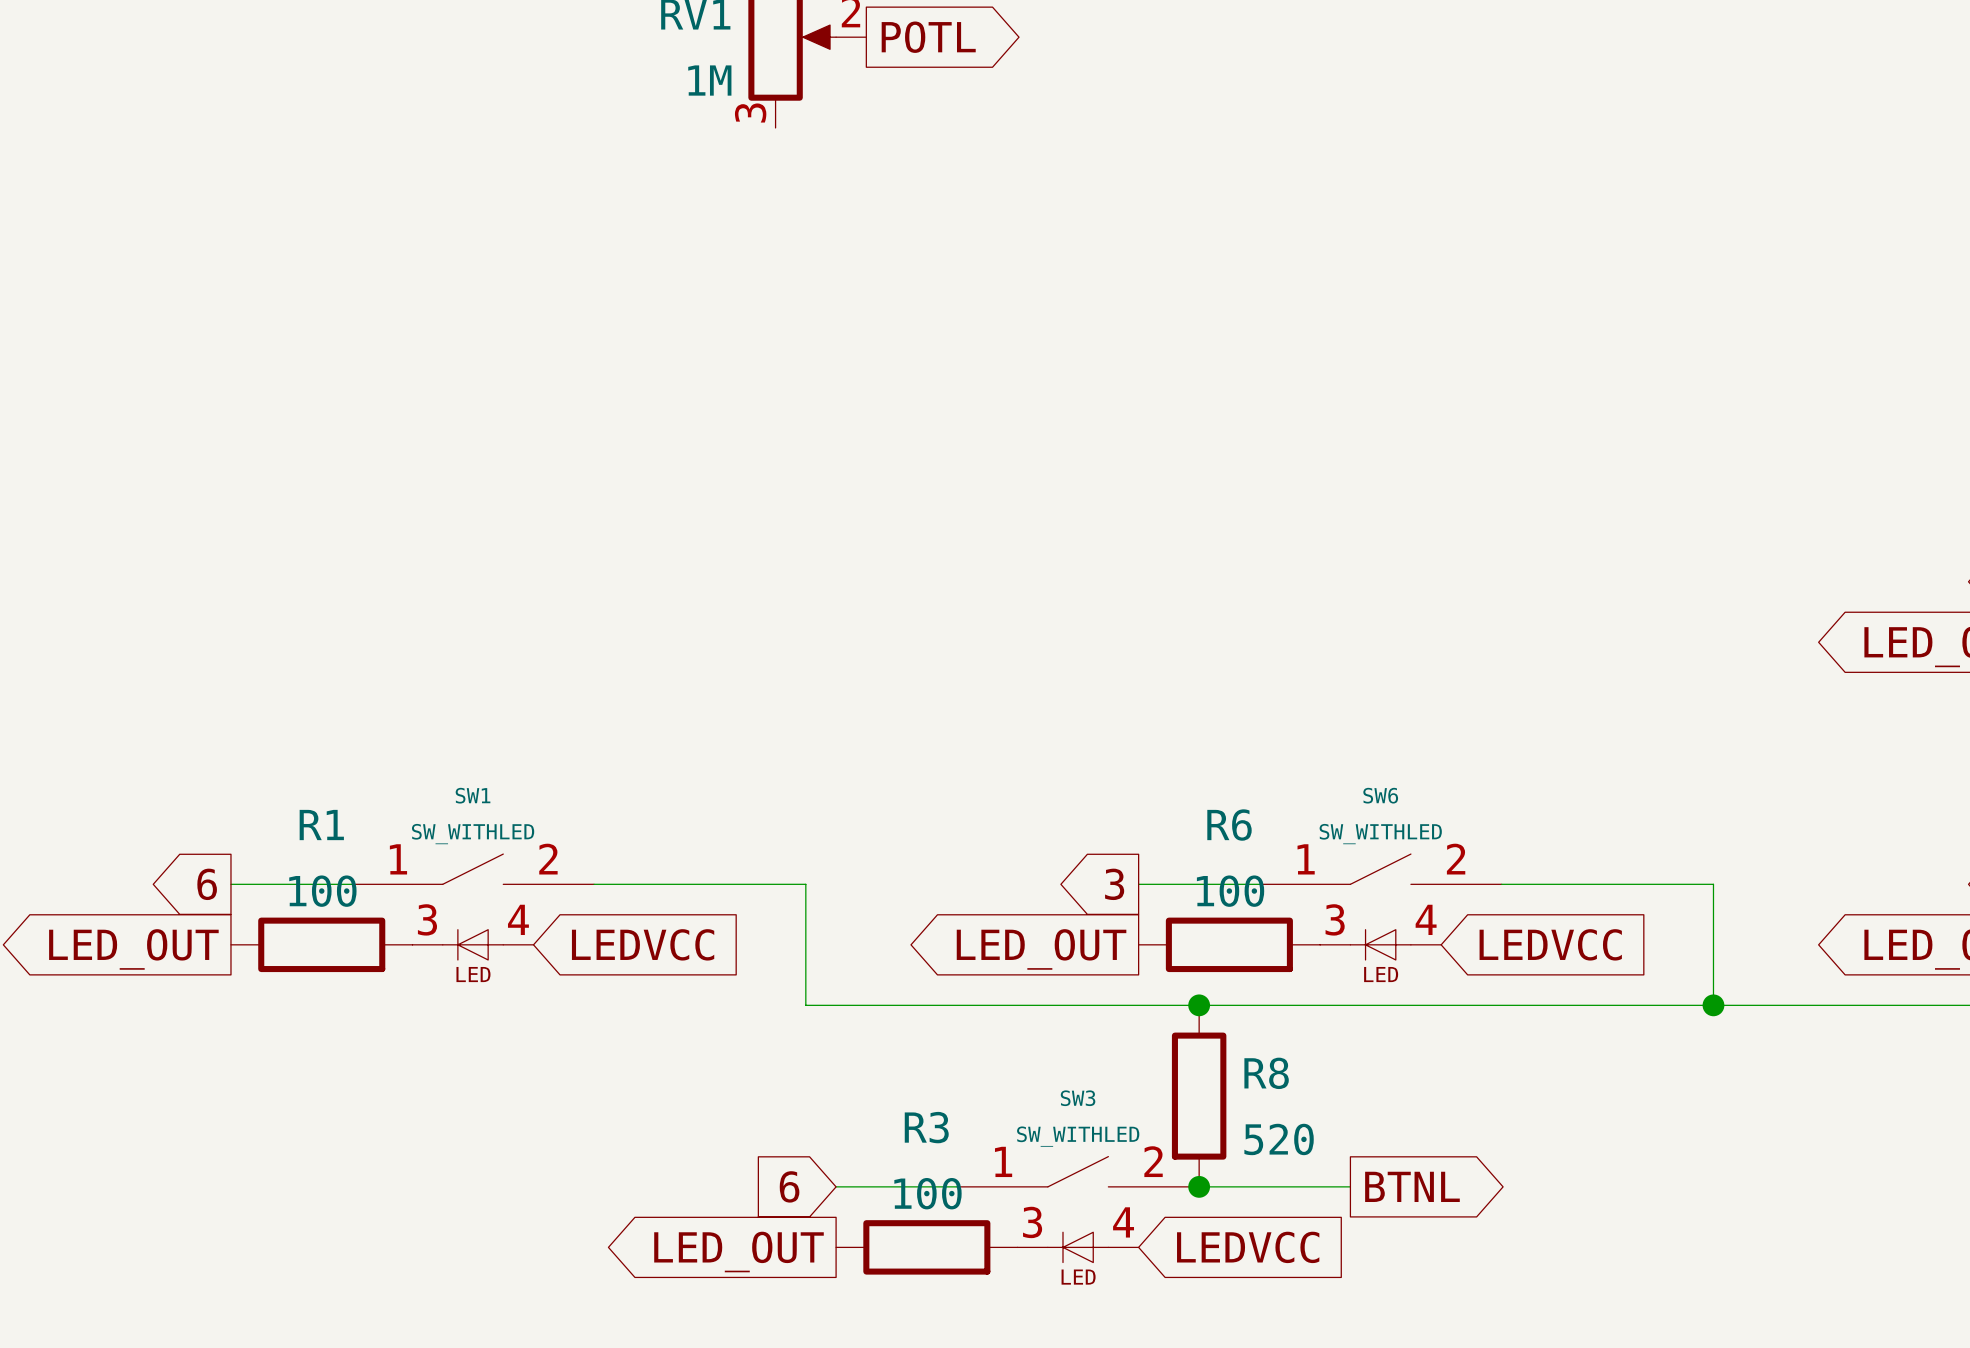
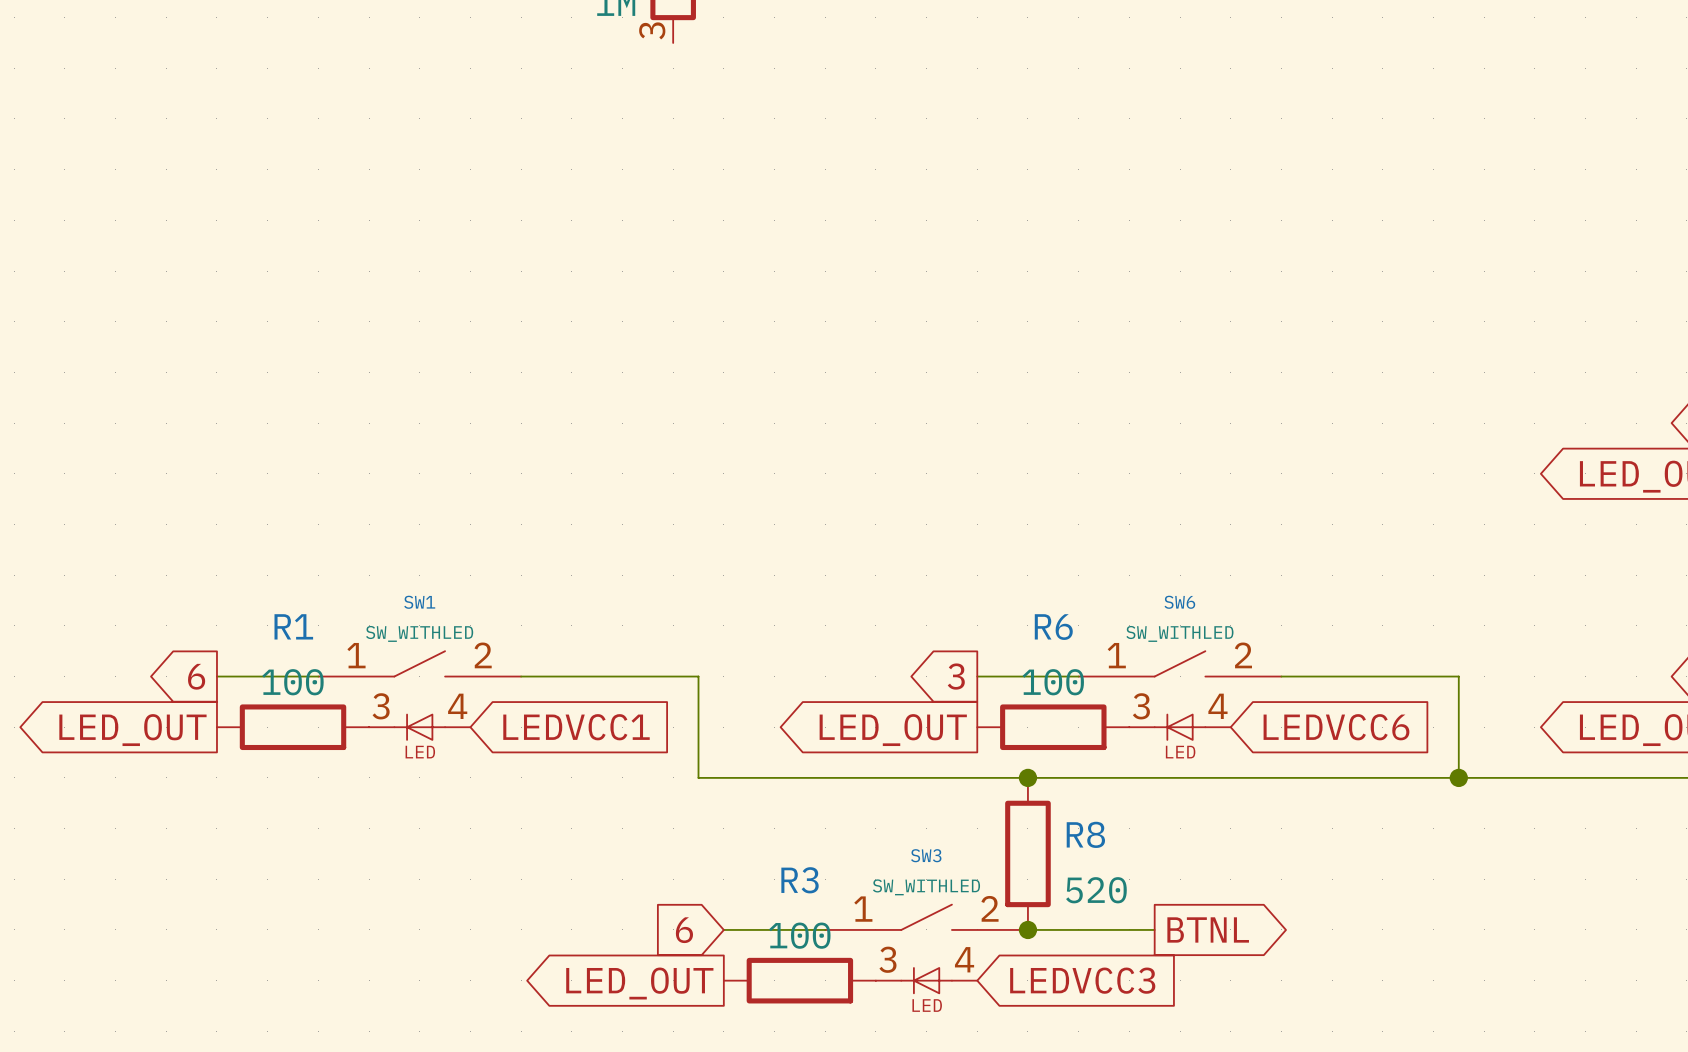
global label: LEDVCC (643, 944) -> LEDVCC1 (576, 727)
global label: LEDVCC (1550, 944) -> LEDVCC6 (1336, 727)
global label: LEDVCC (1248, 1247) -> LEDVCC3 (1082, 980)

